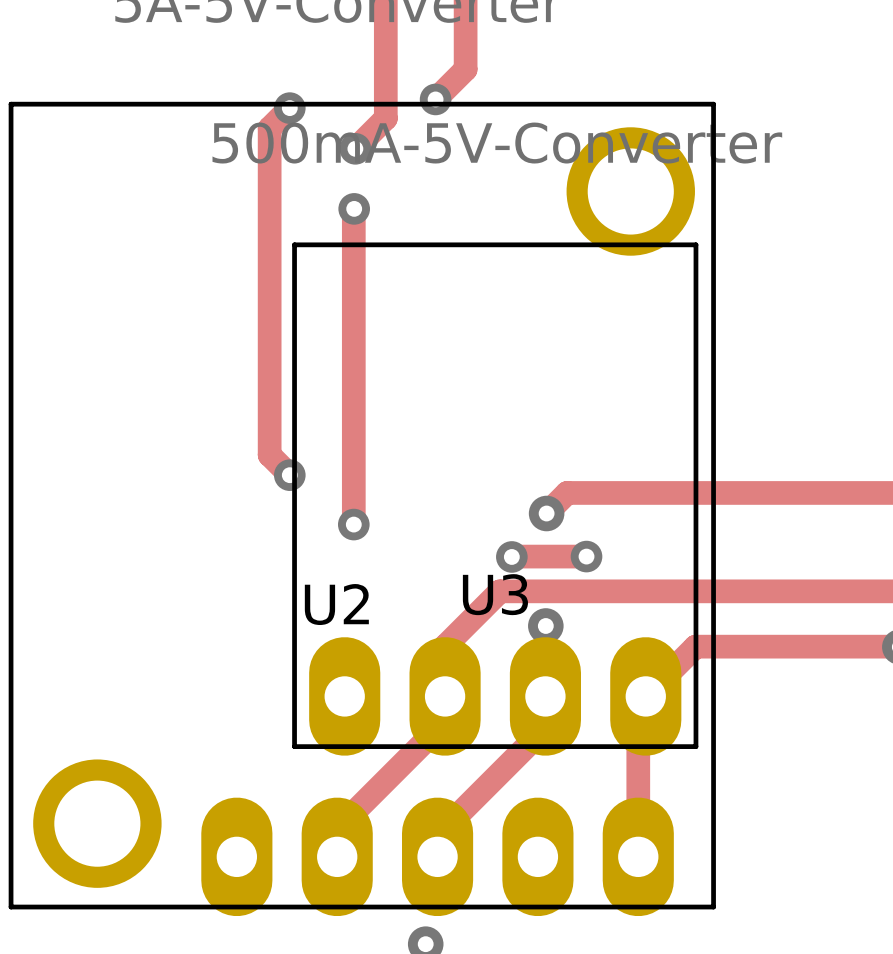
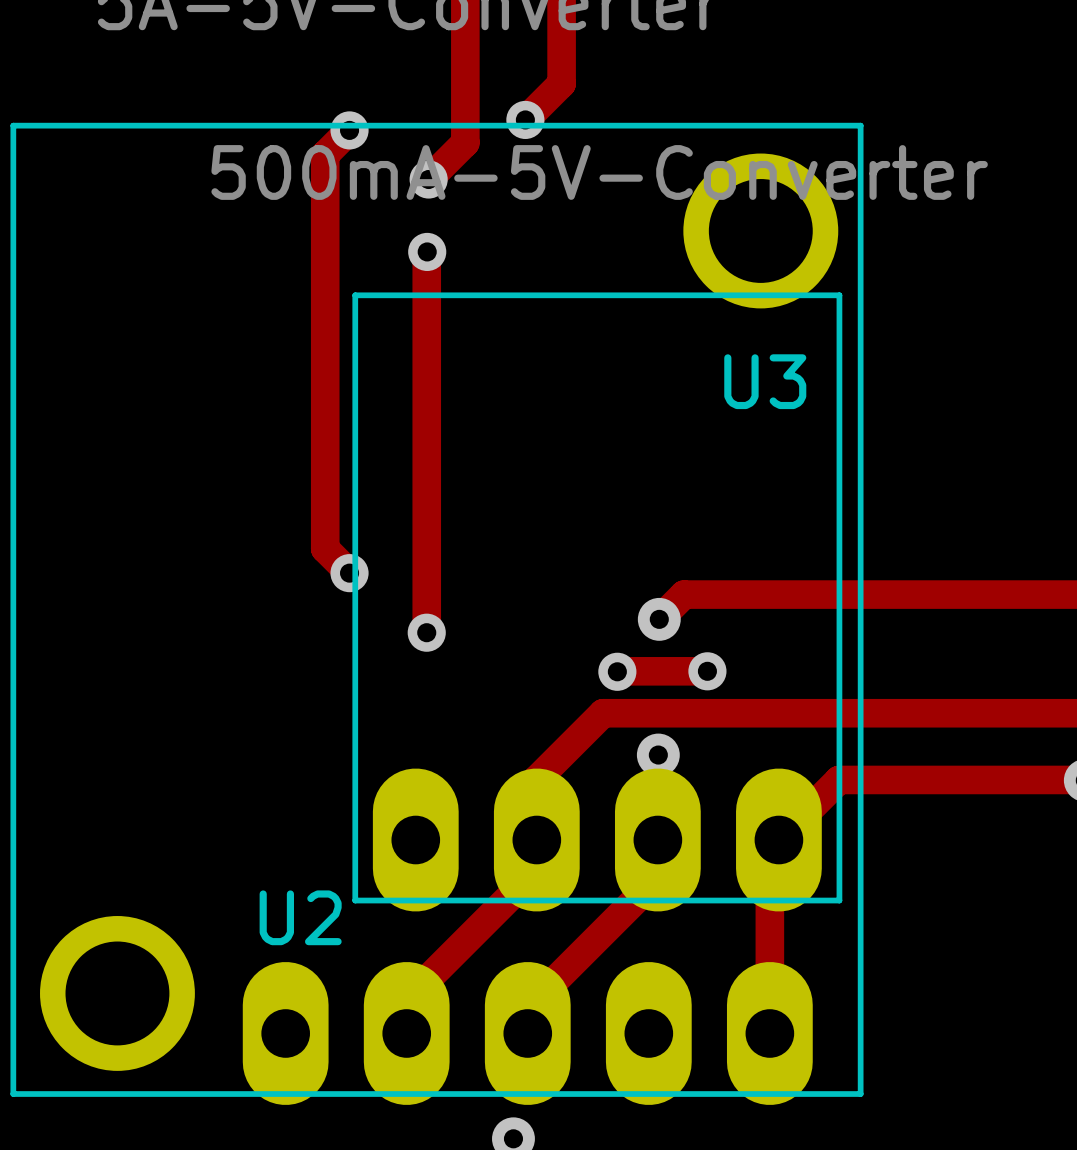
U3 name position: U3 (495, 594) -> U3 (765, 381)
U2 name position: U2 (336, 604) -> U2 (300, 917)

